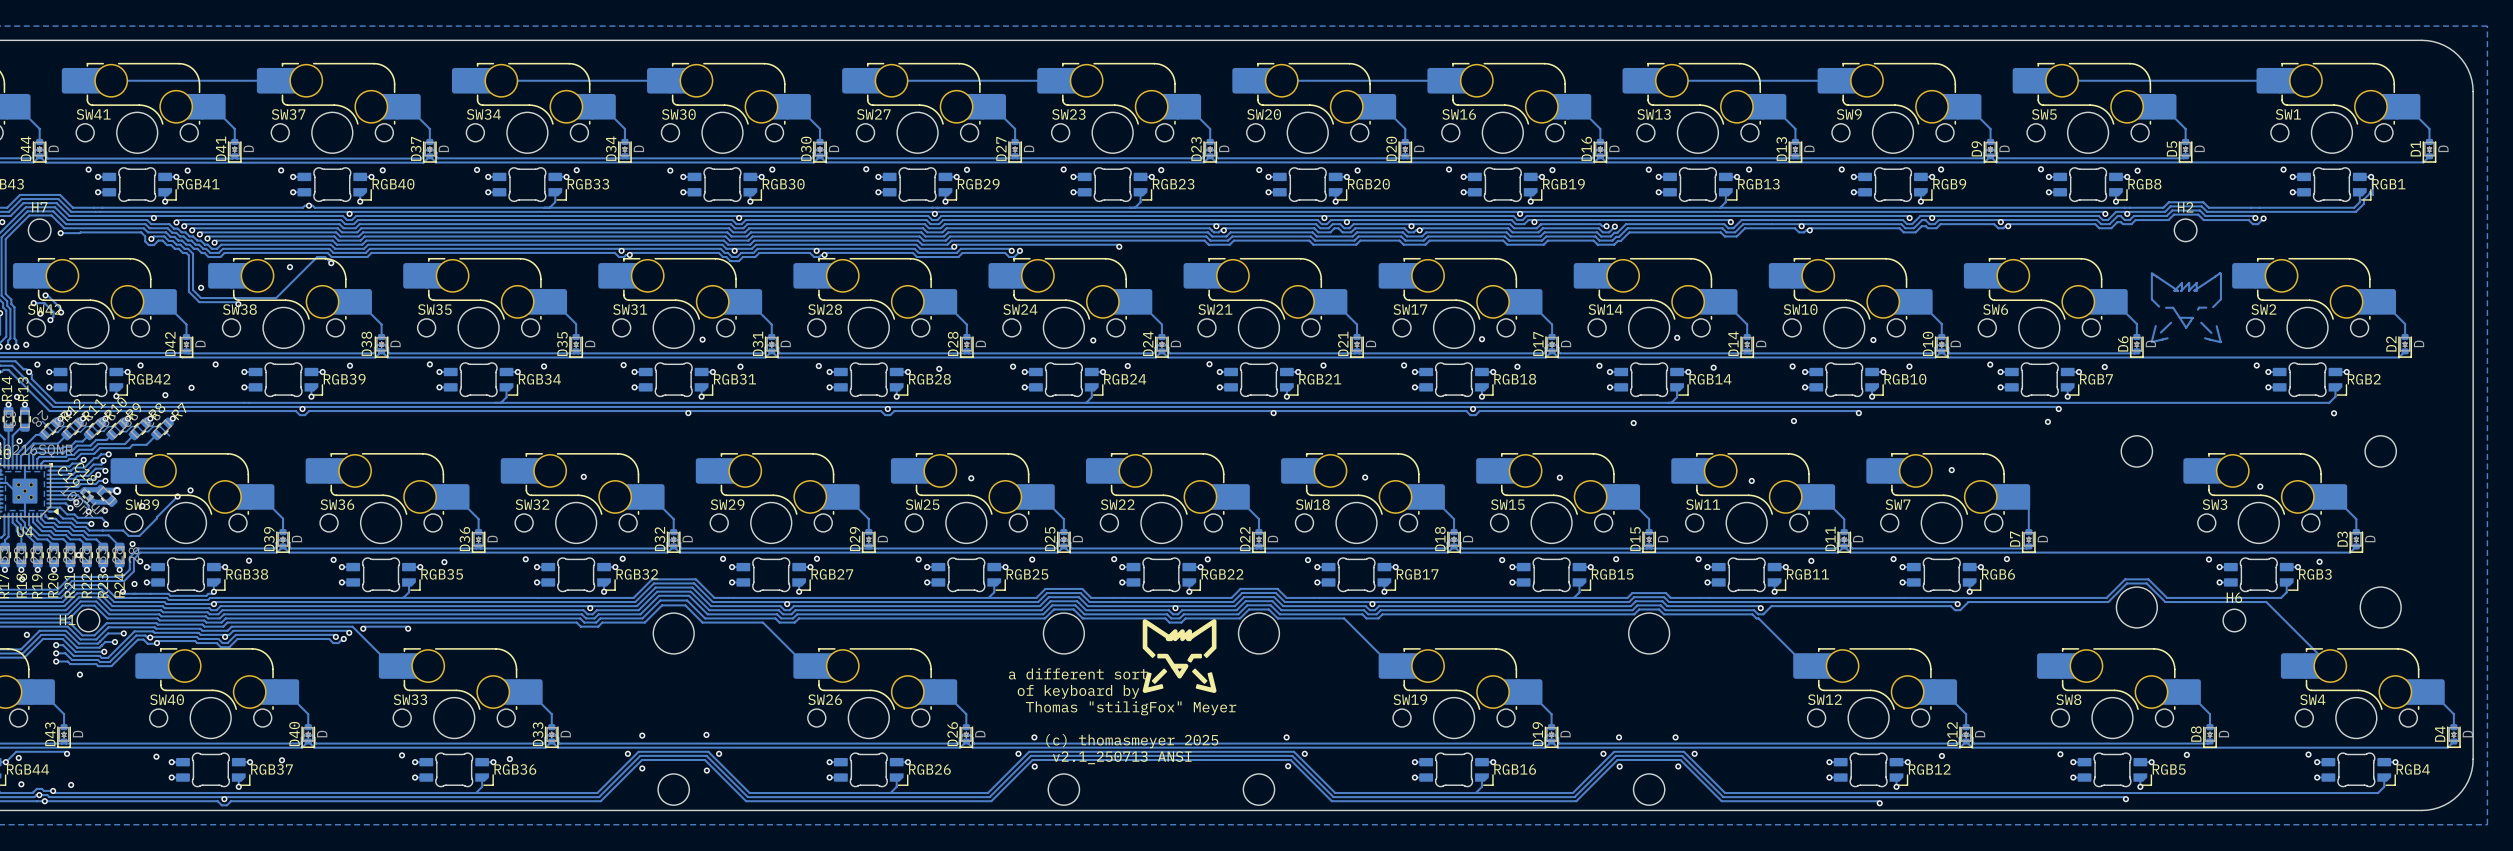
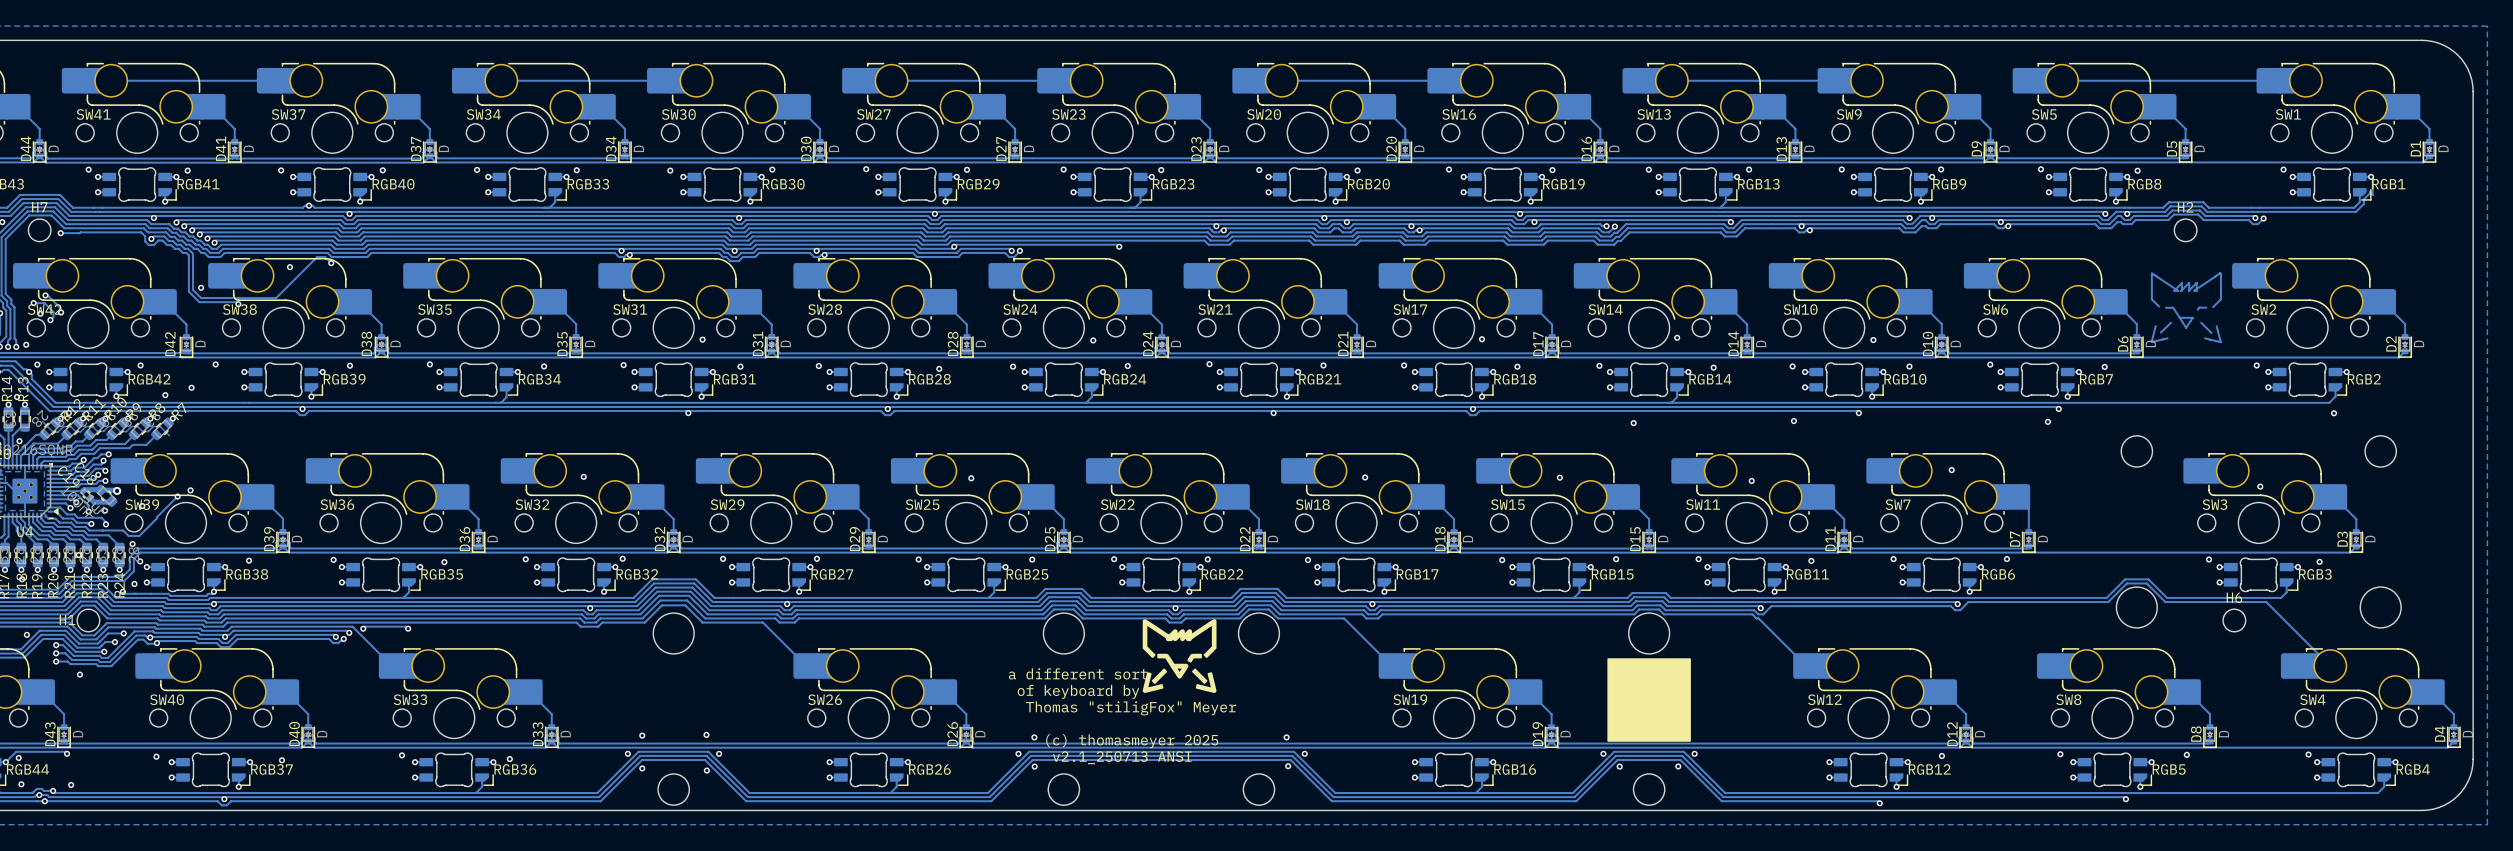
drawing: none -> [1607, 658, 1691, 742]

